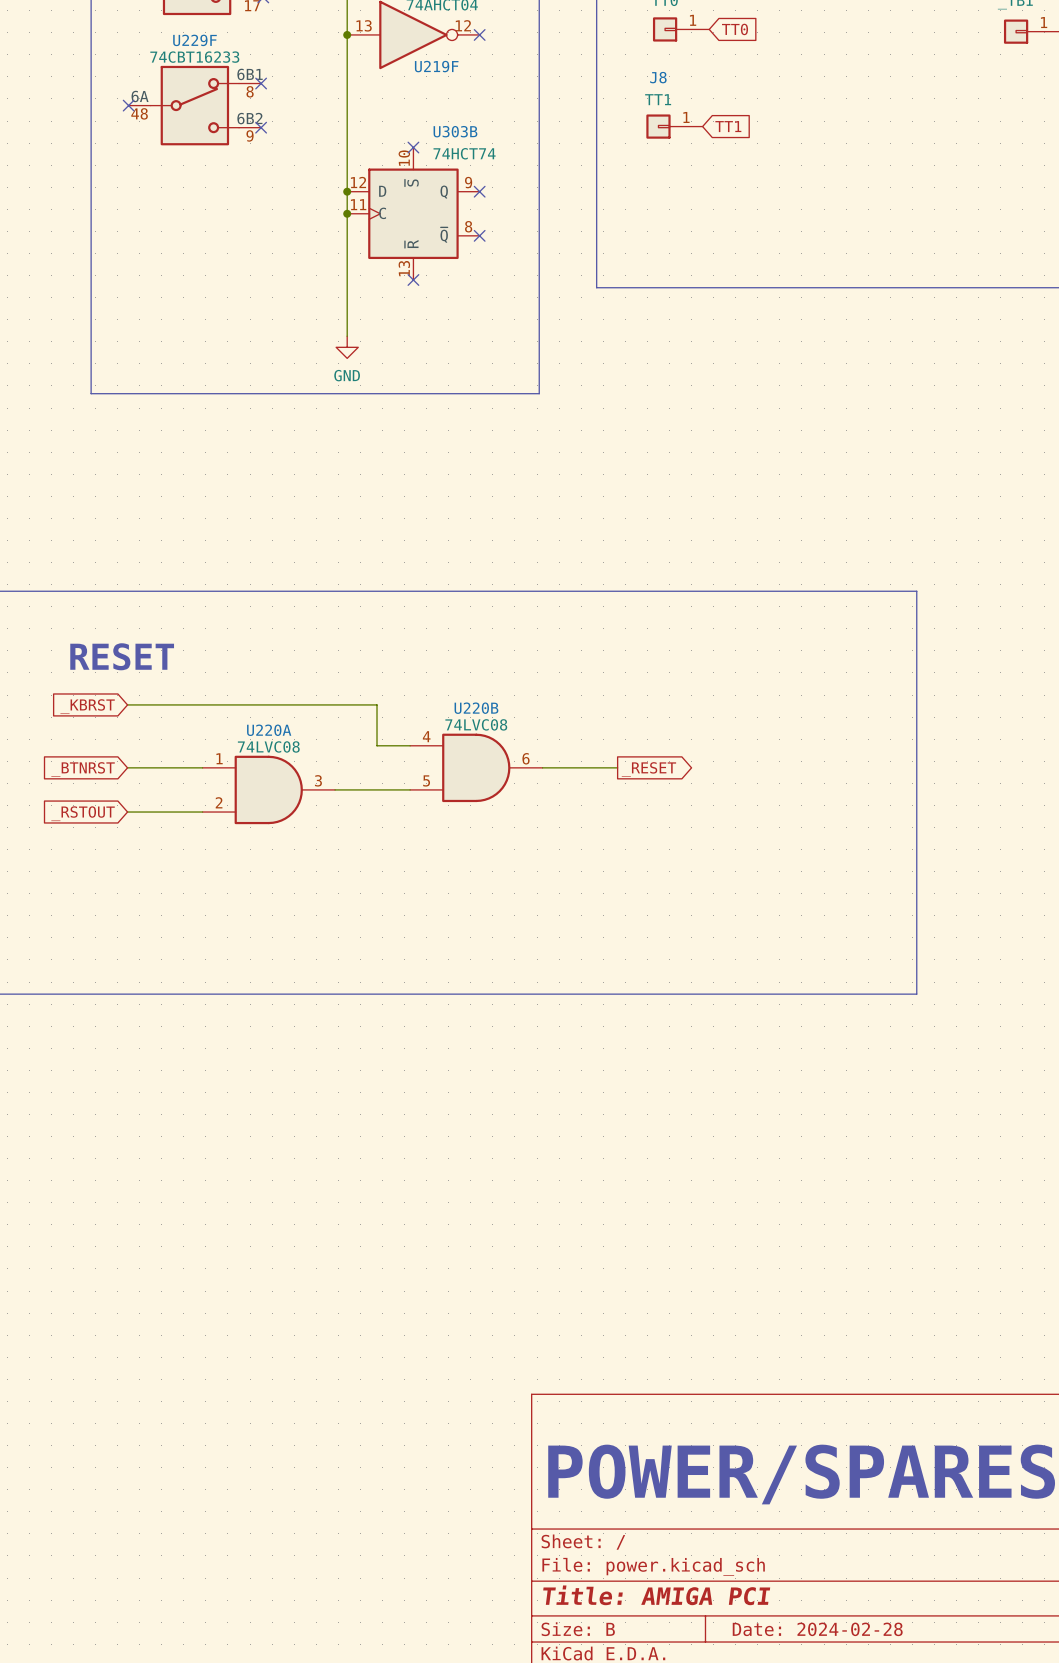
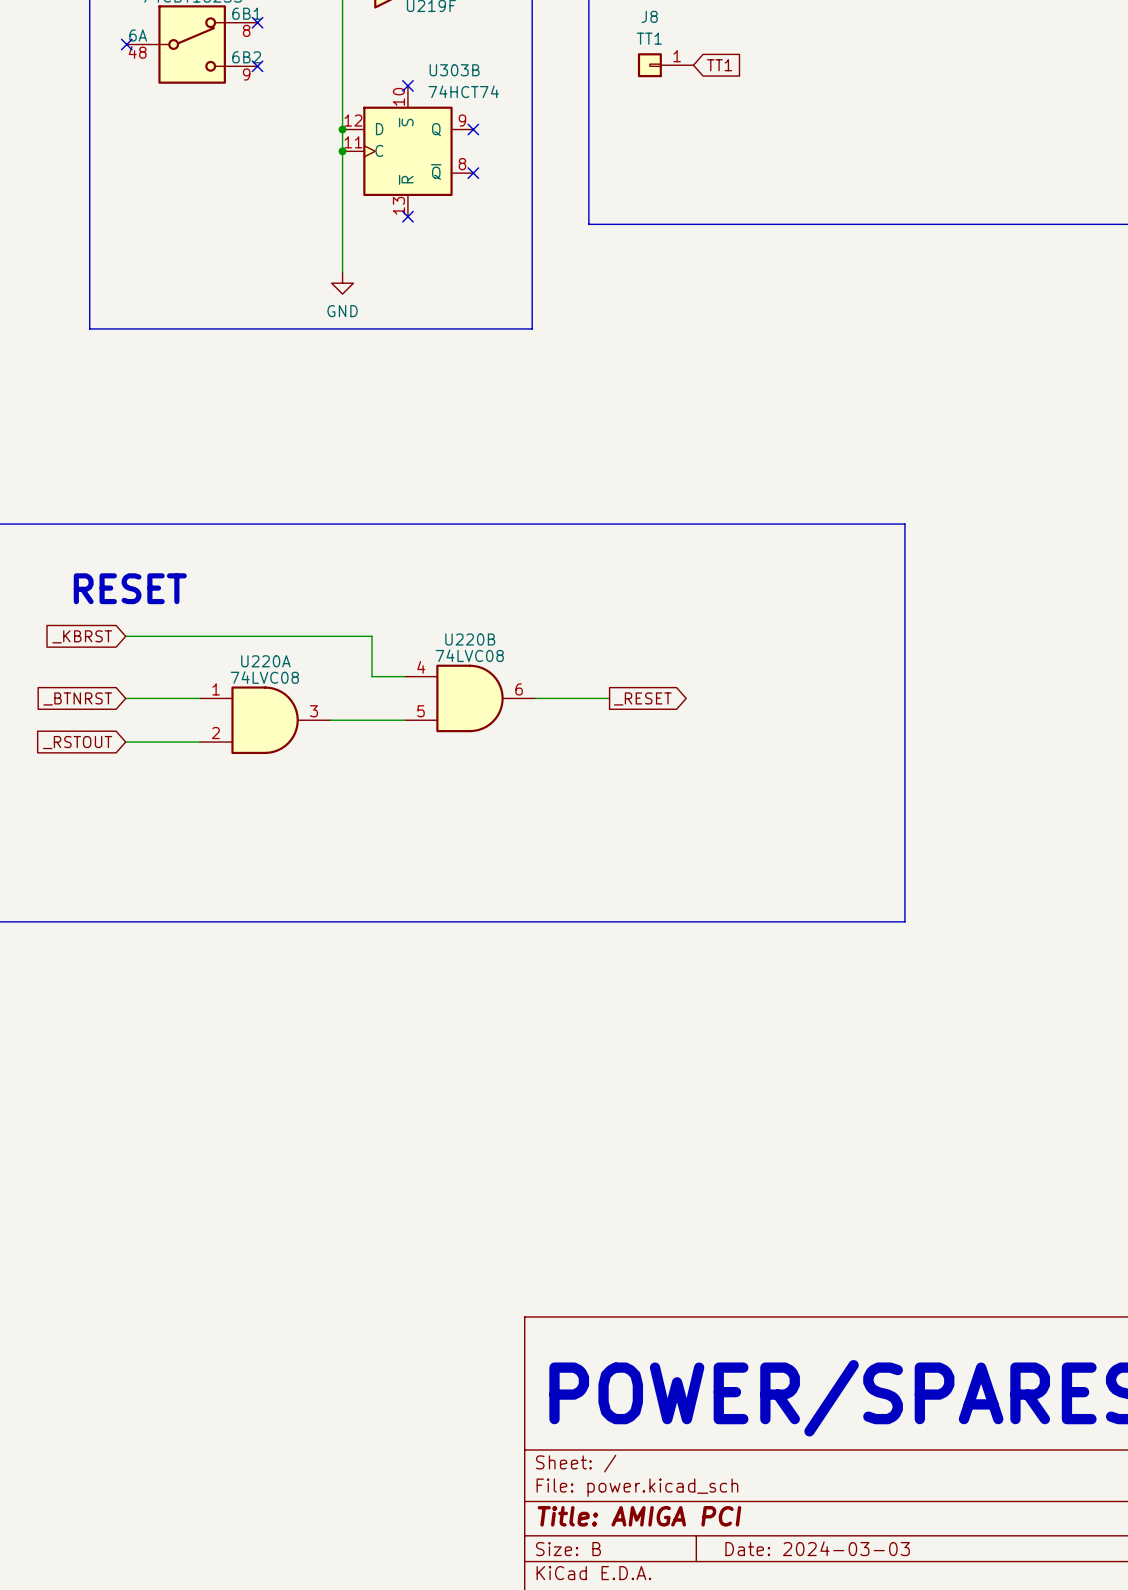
title block: Date: 2024-02-28 (817, 1629) -> Date: 2024-03-03 (817, 1548)

